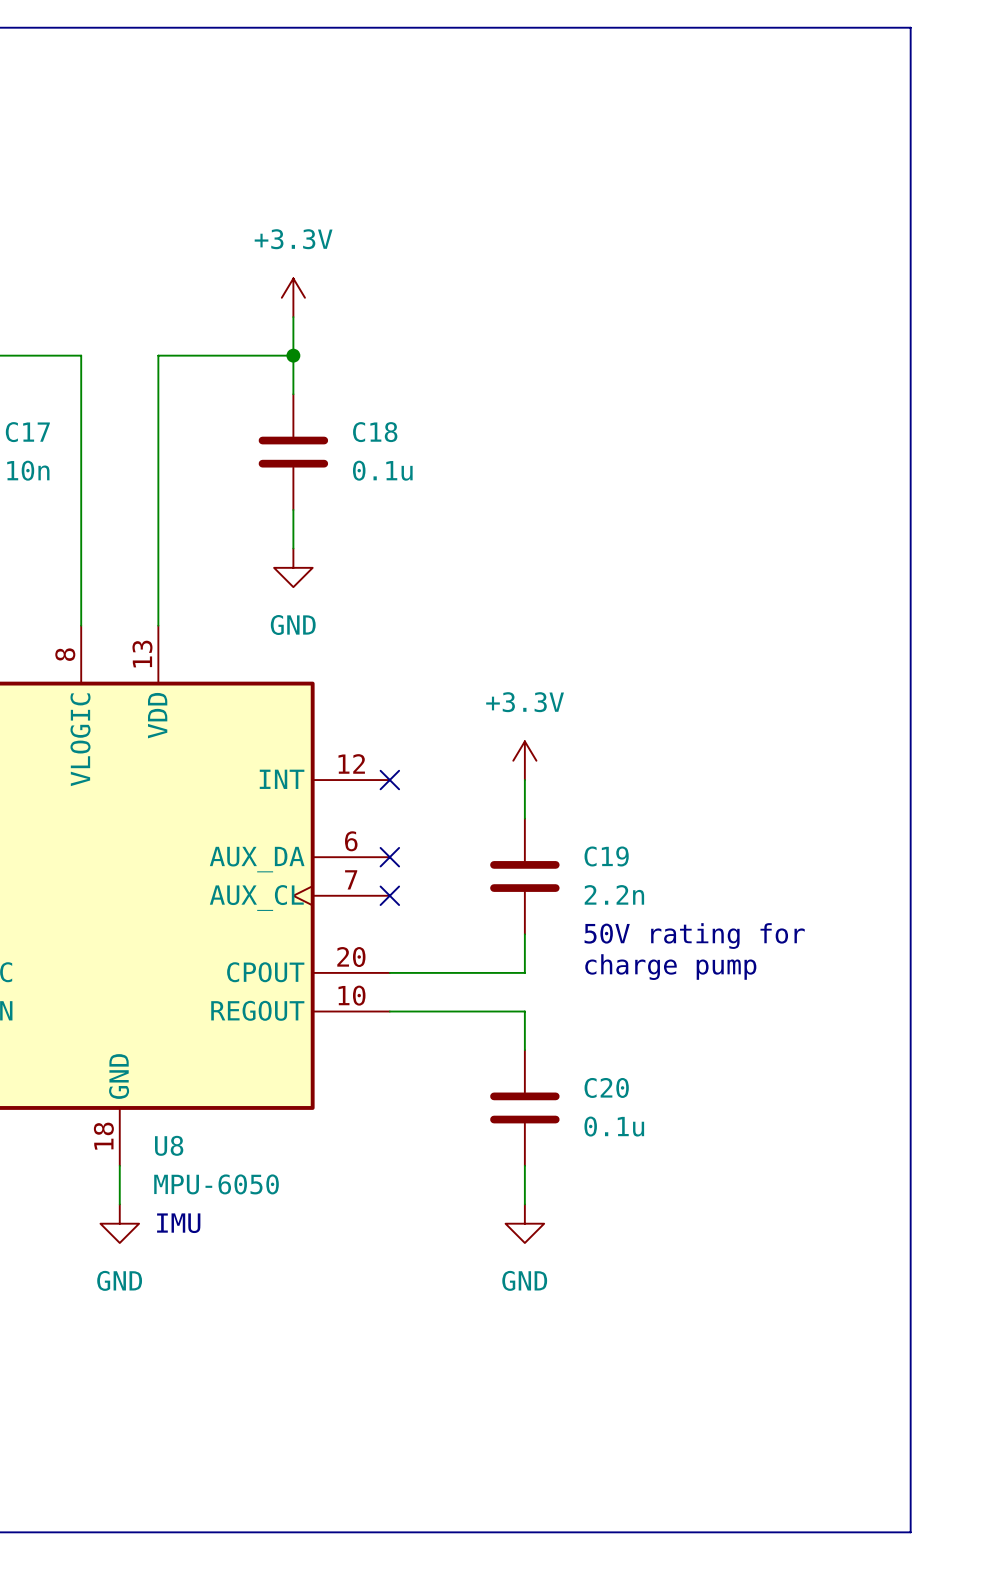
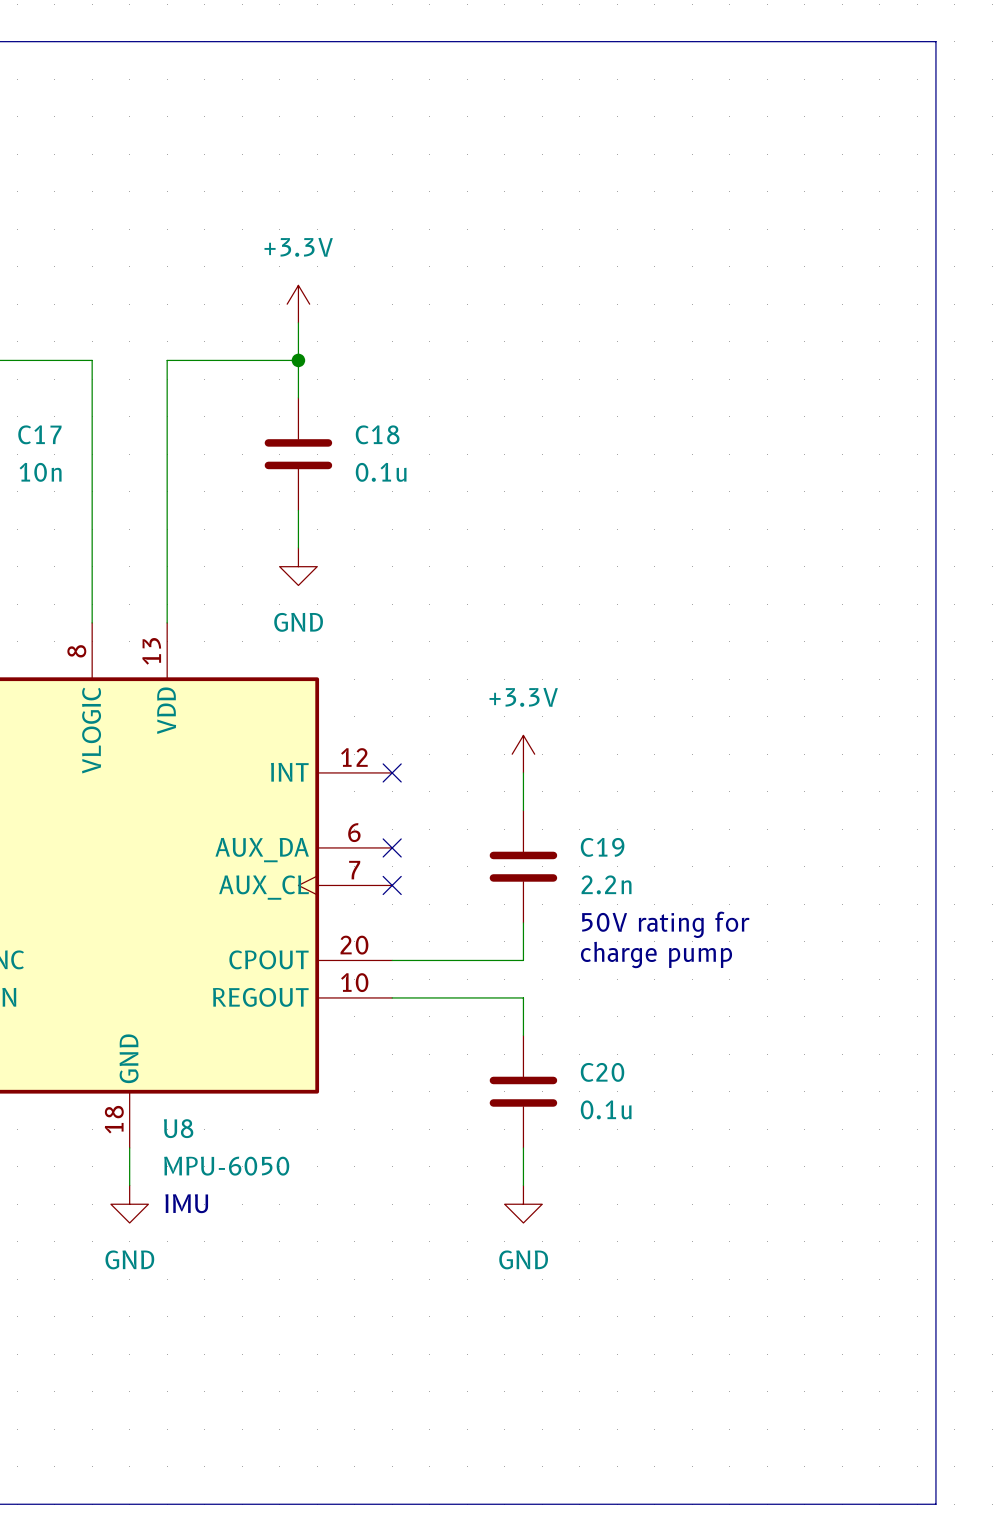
line: (910, 27) (910, 1532) -> (898, 41) (935, 41) (935, 1504) (898, 1504)

